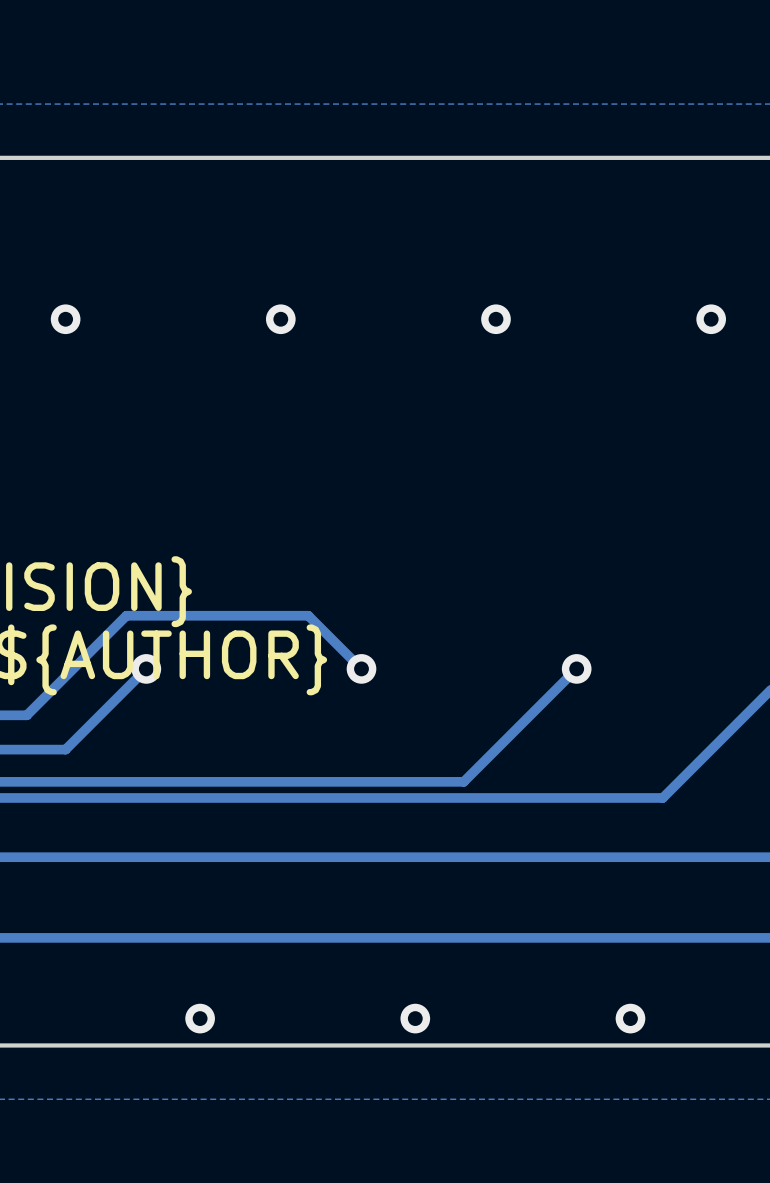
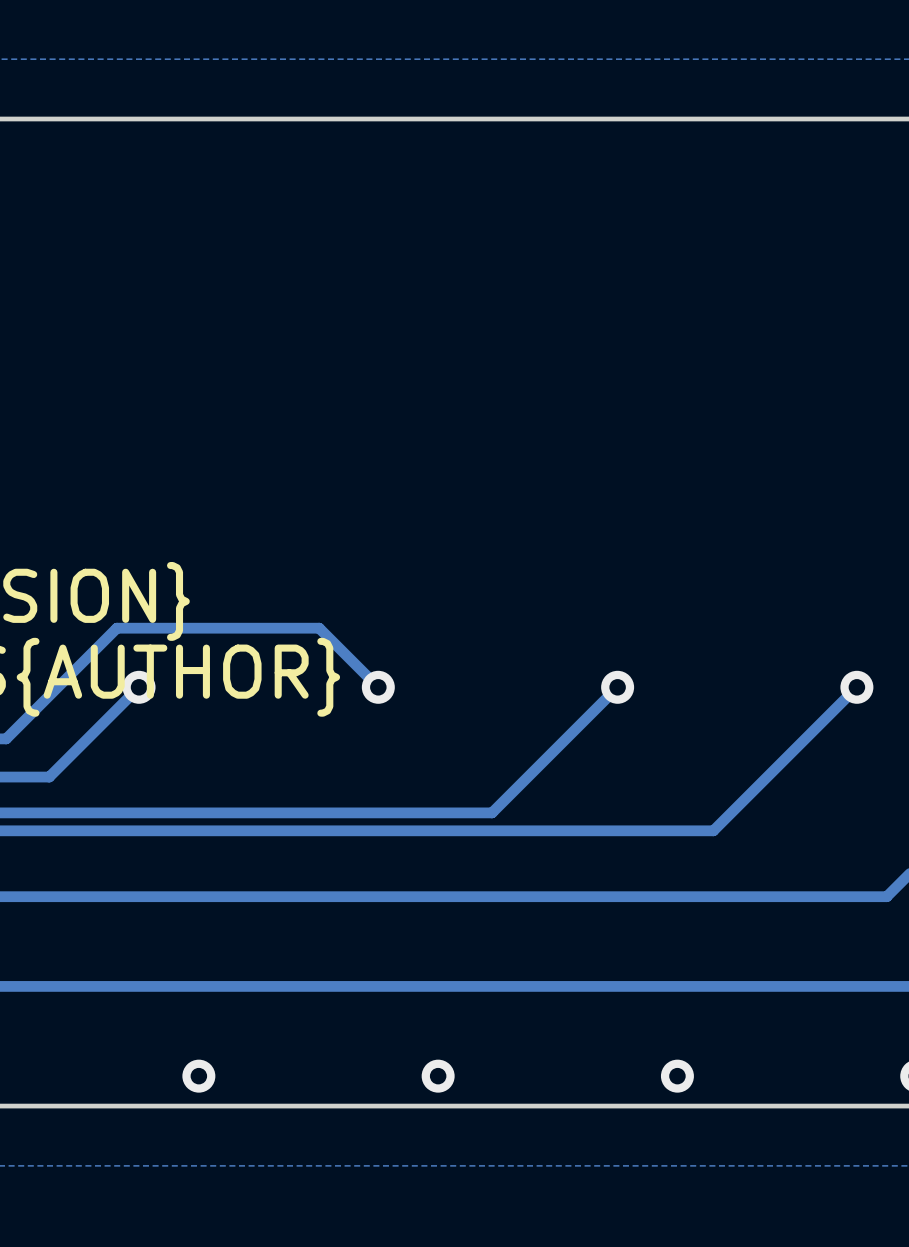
via: (65, 319) -> none
via: (280, 319) -> none
via: (495, 319) -> none
via: (711, 319) -> none

